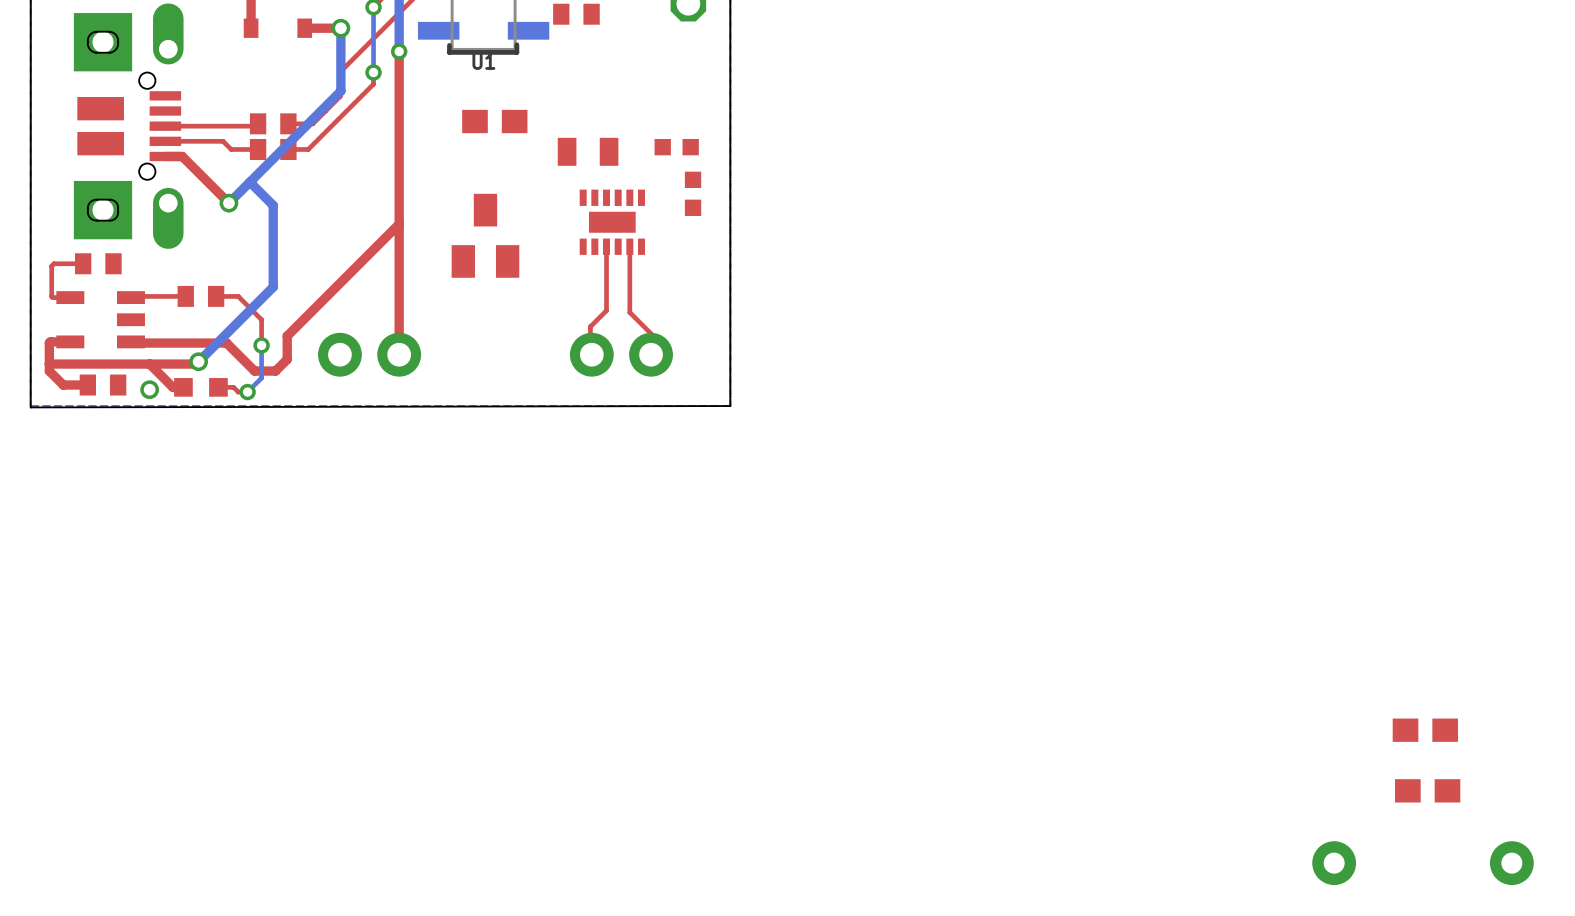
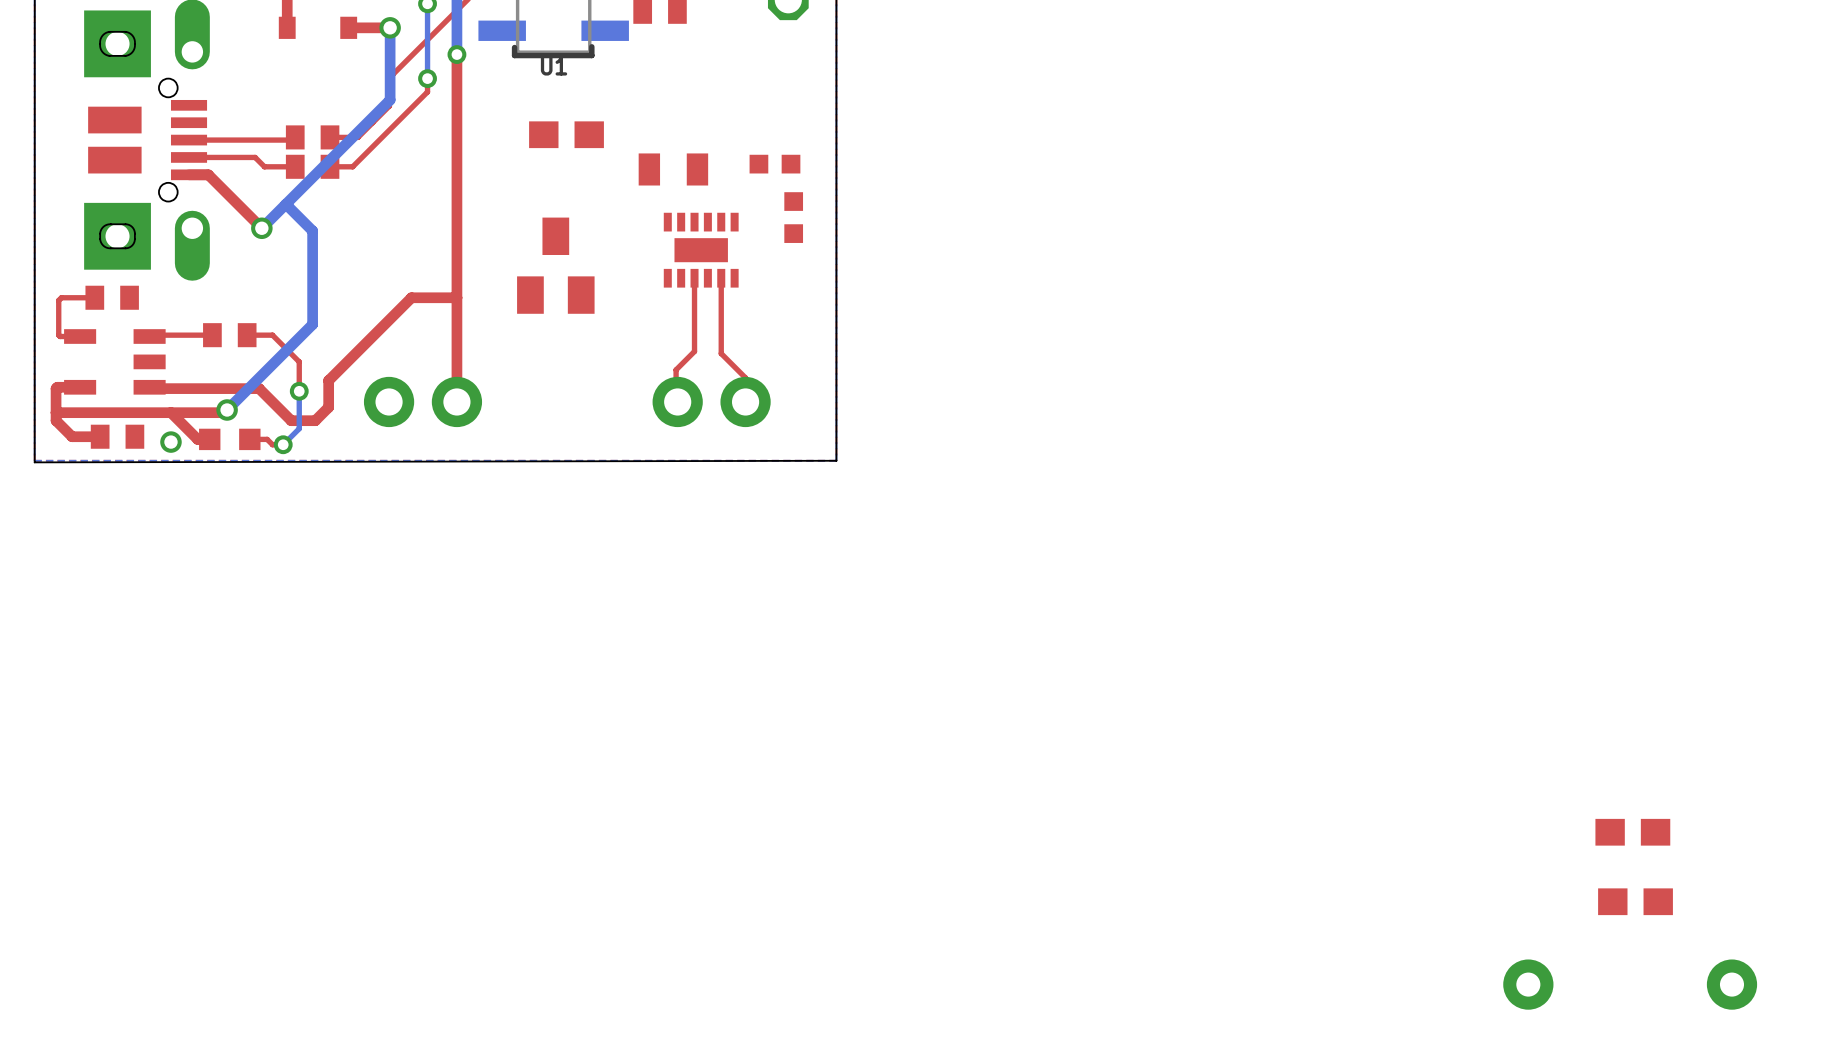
top track: (399, 224) (359, 263) -> (456, 297) (411, 297)

